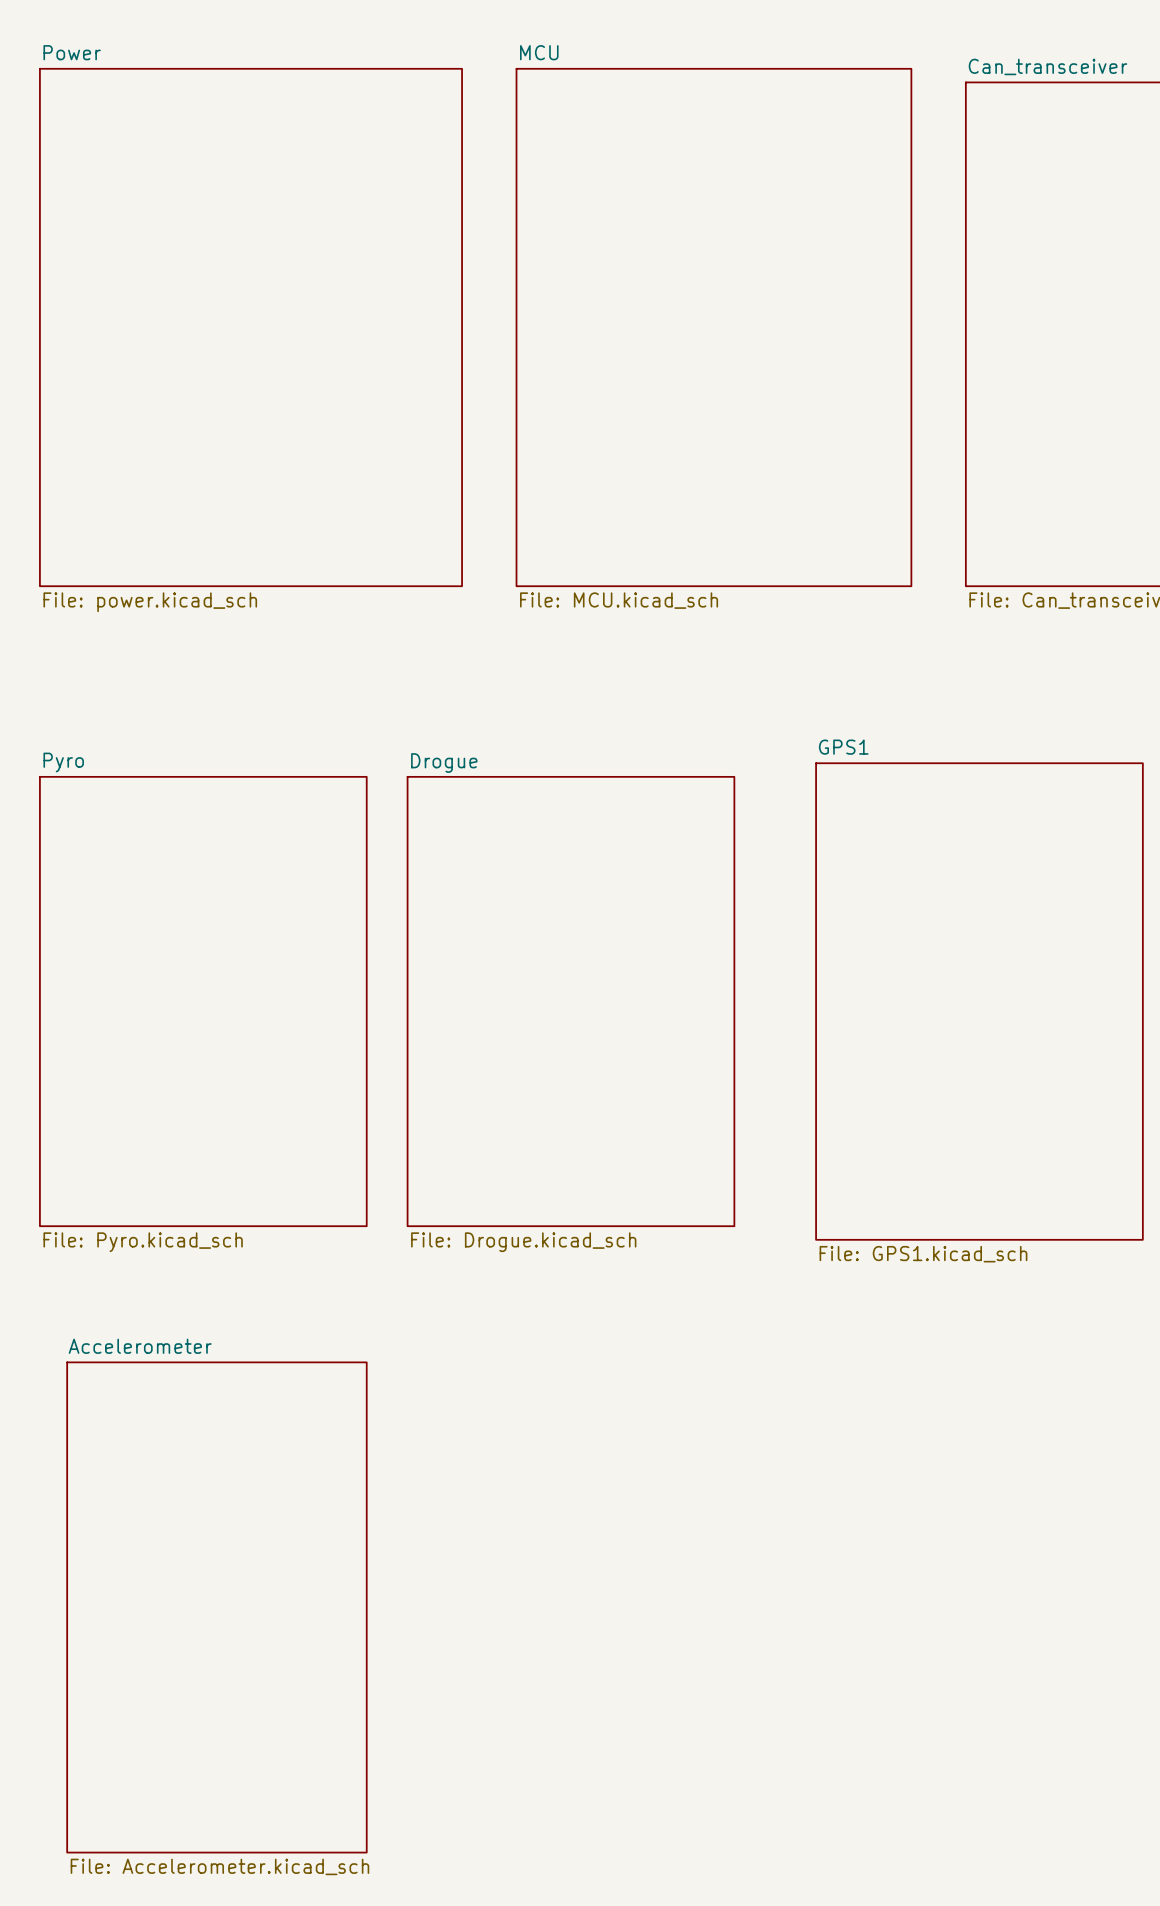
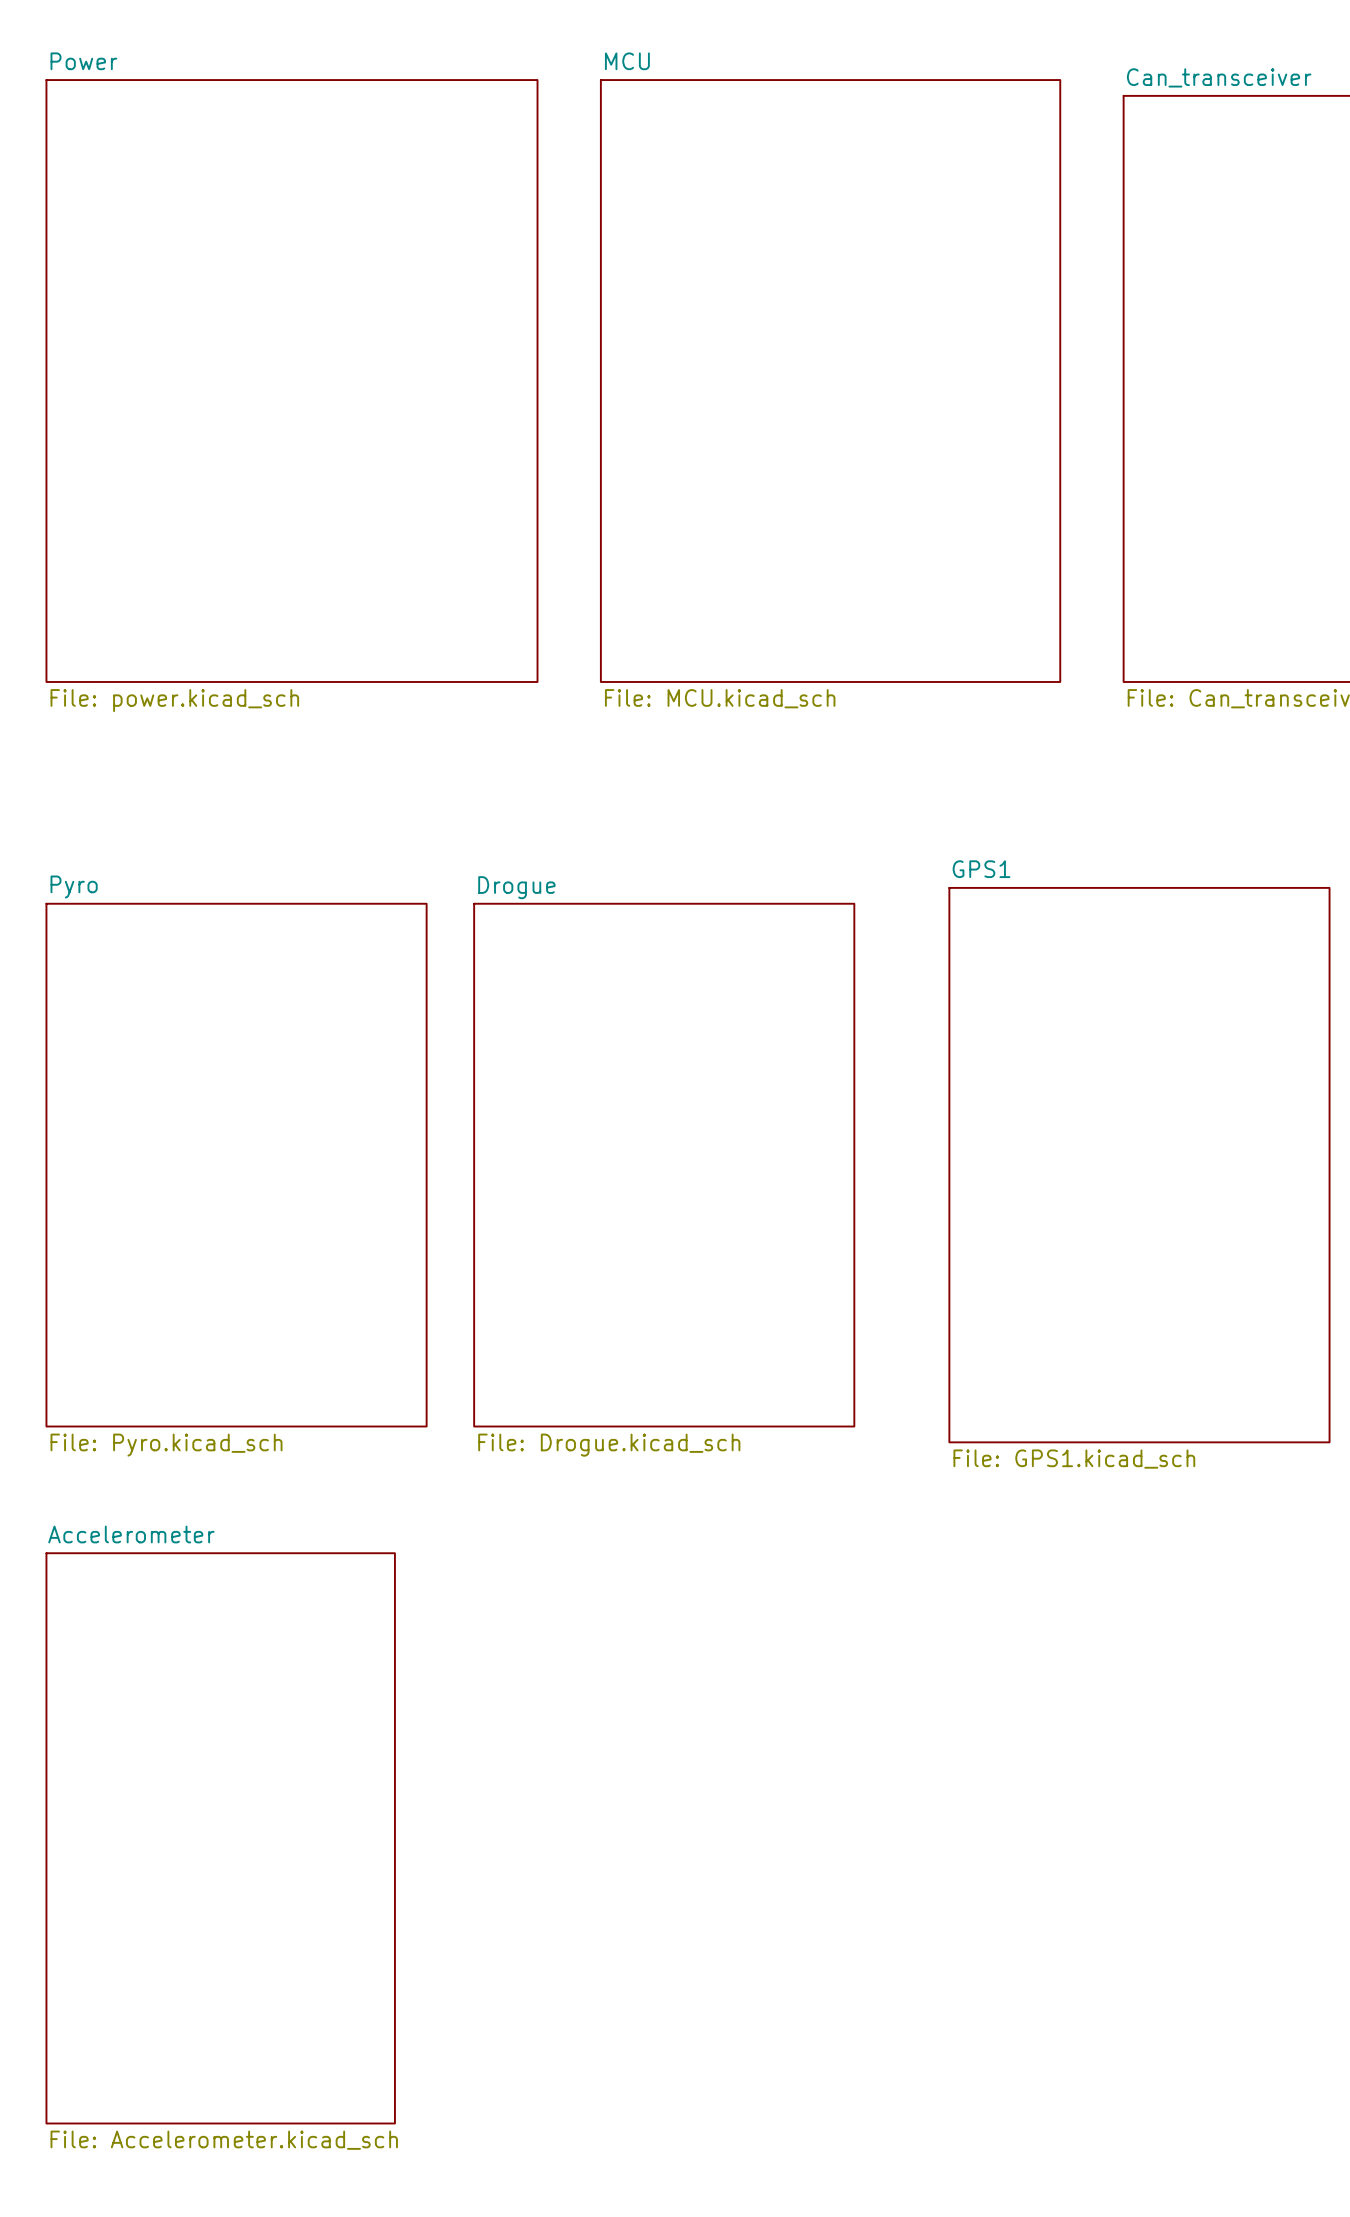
sheet Accelerometer position: (216, 1607) -> (220, 1838)

